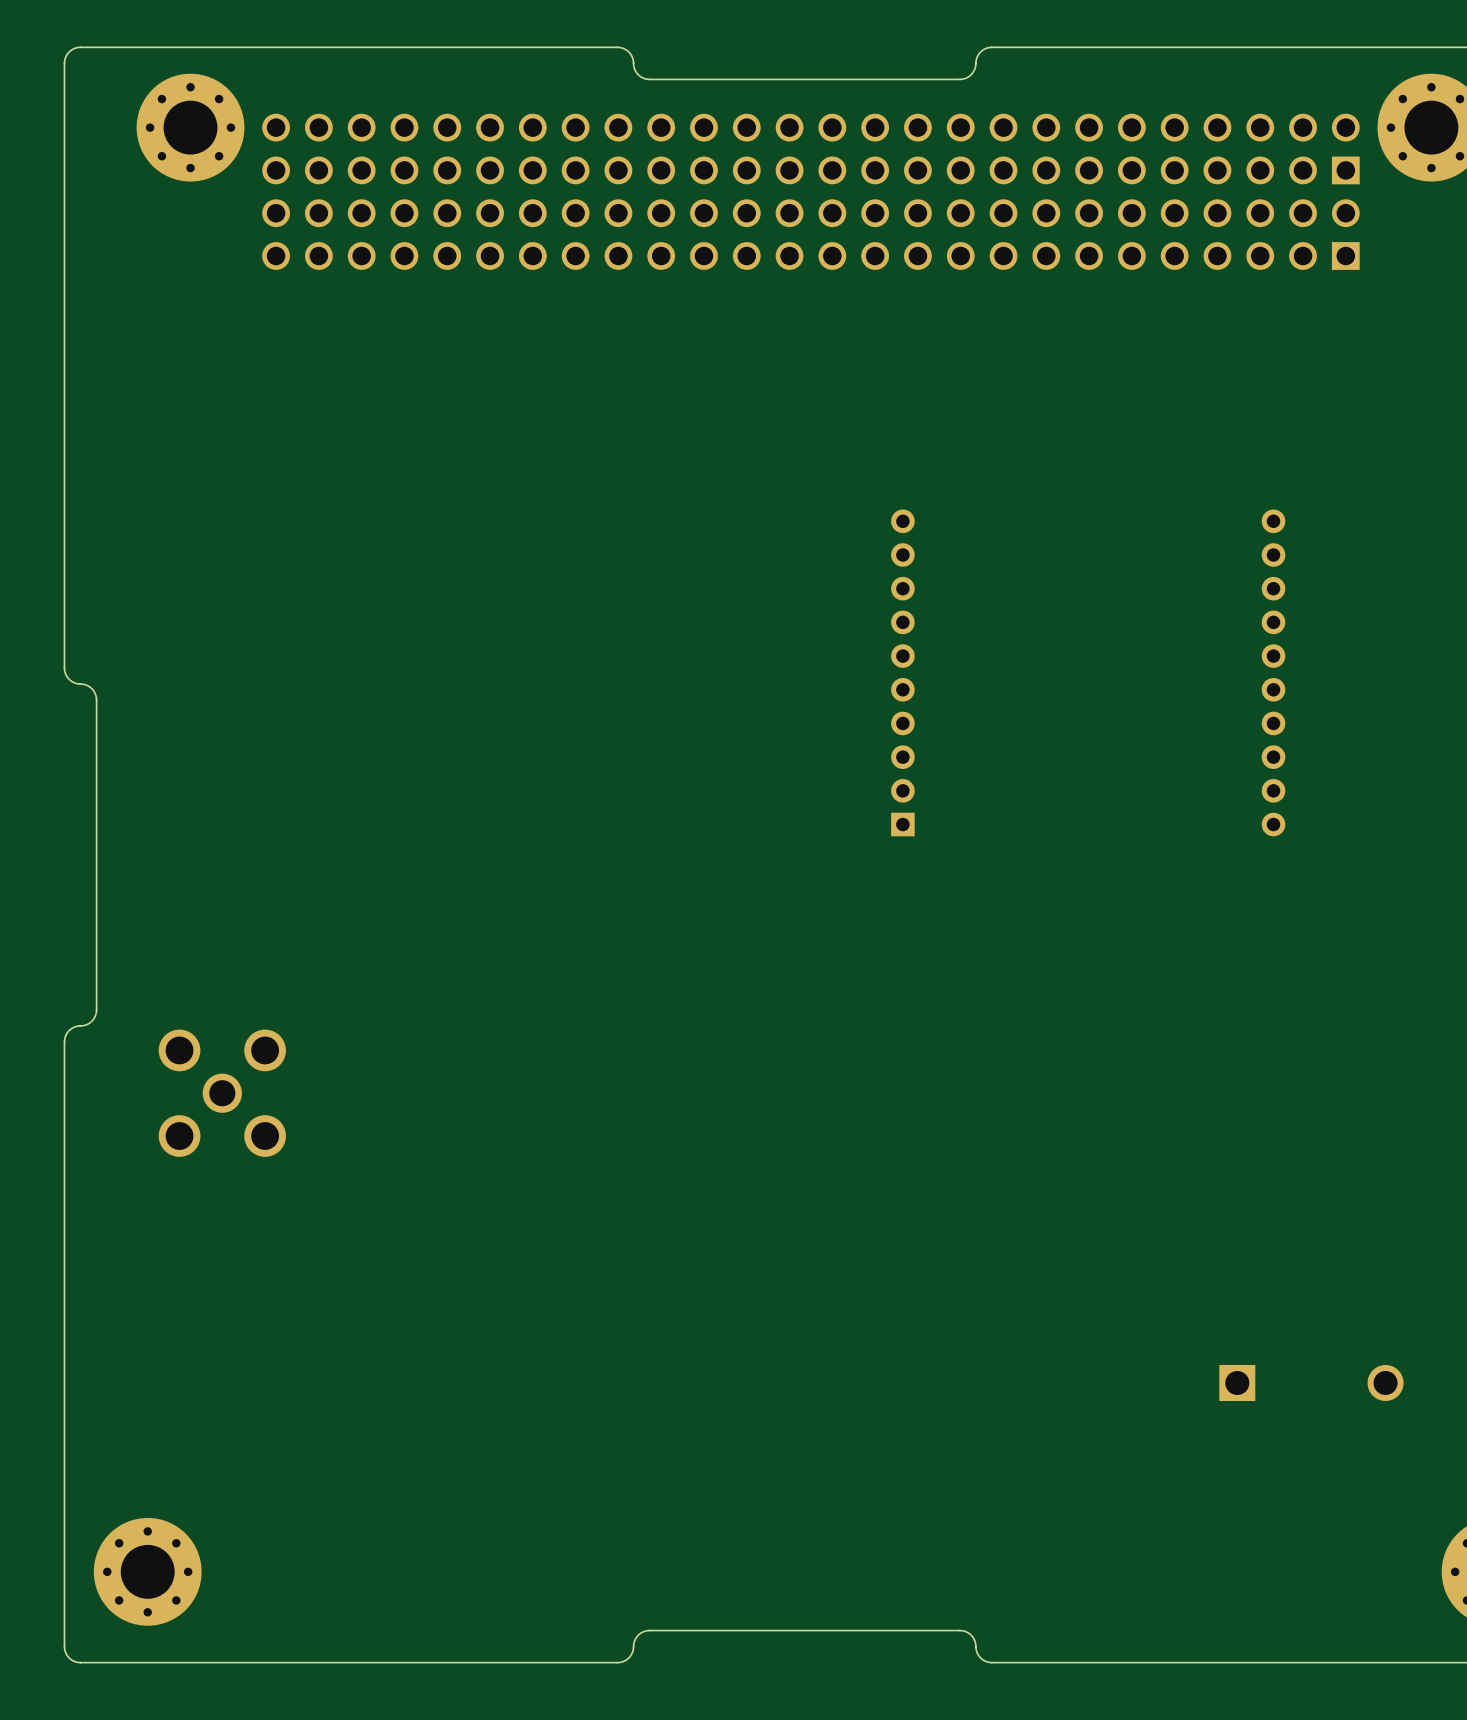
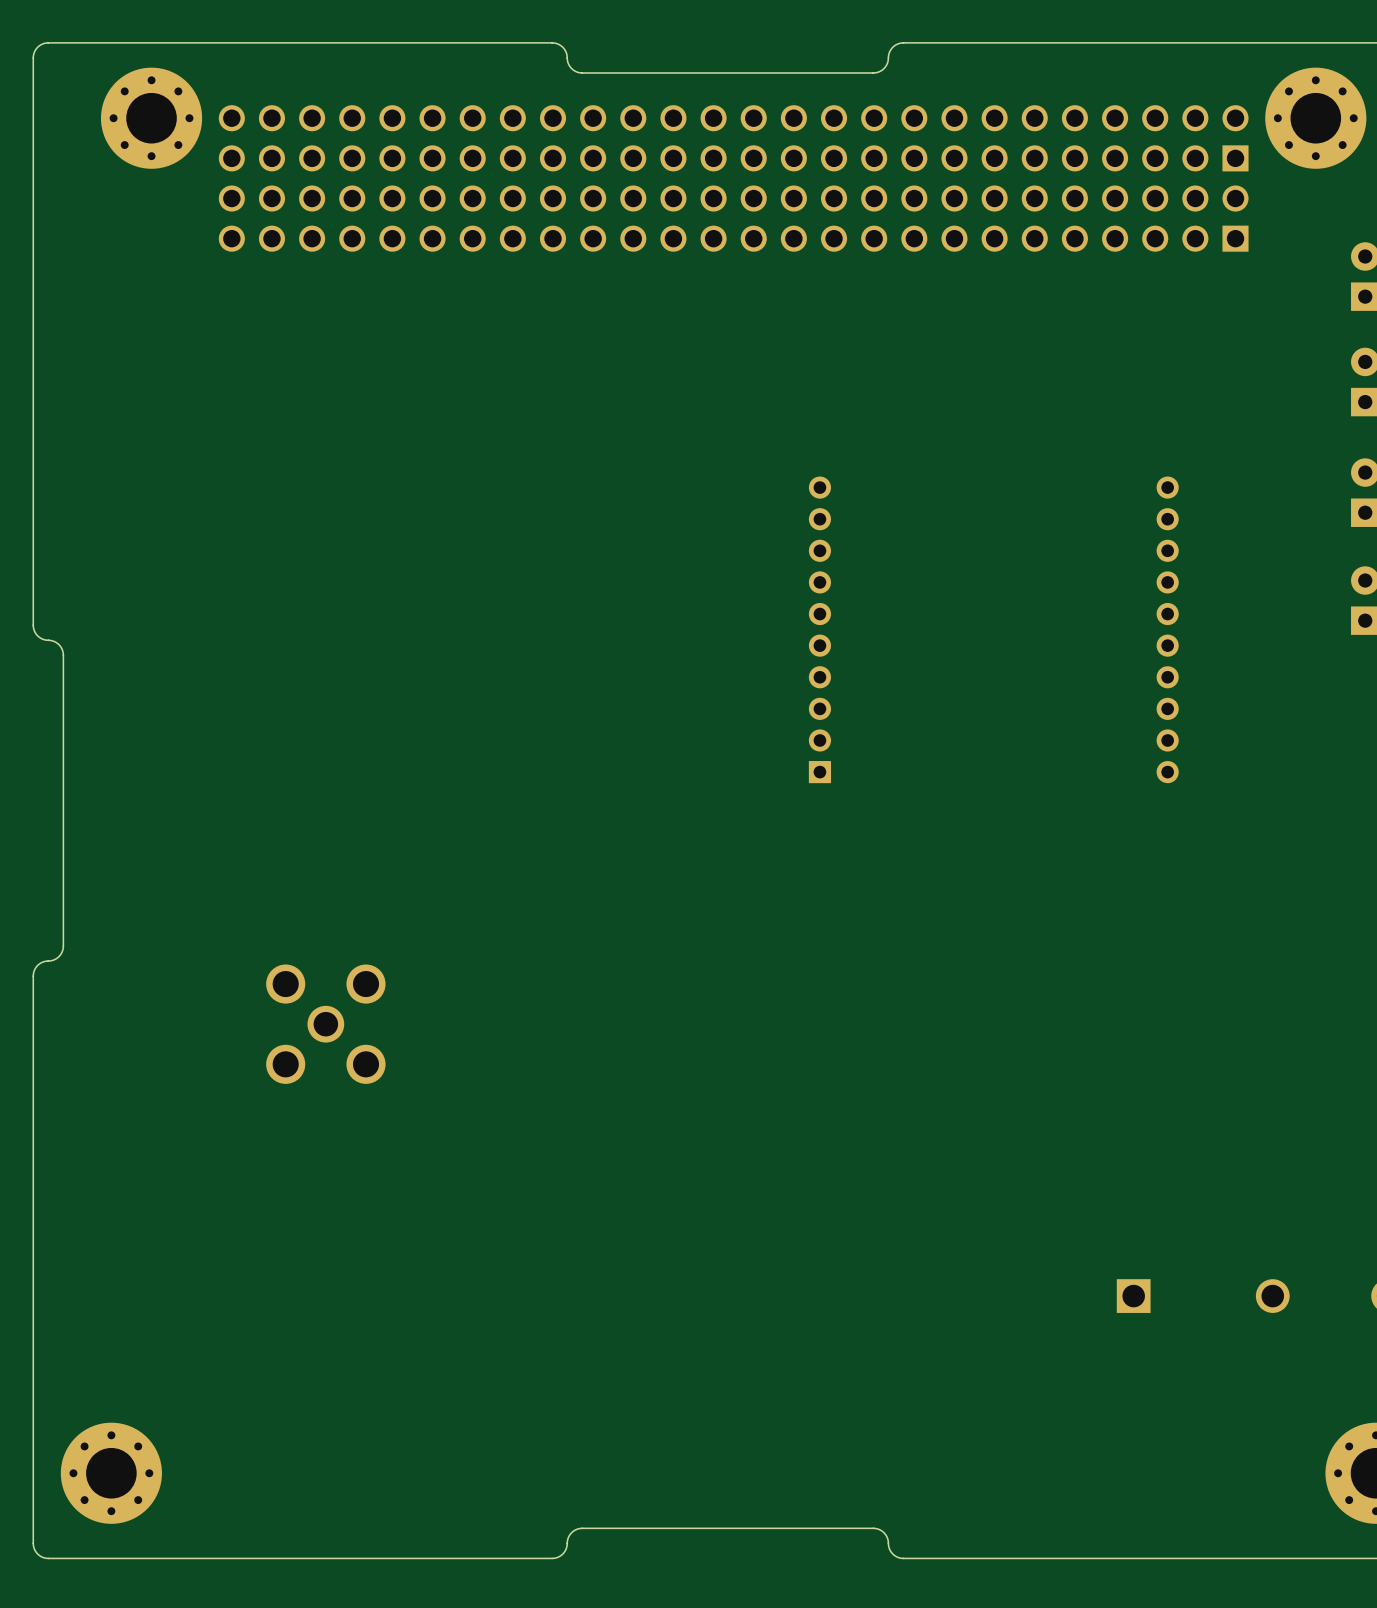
part position: (222, 1093) -> (325, 1024)

